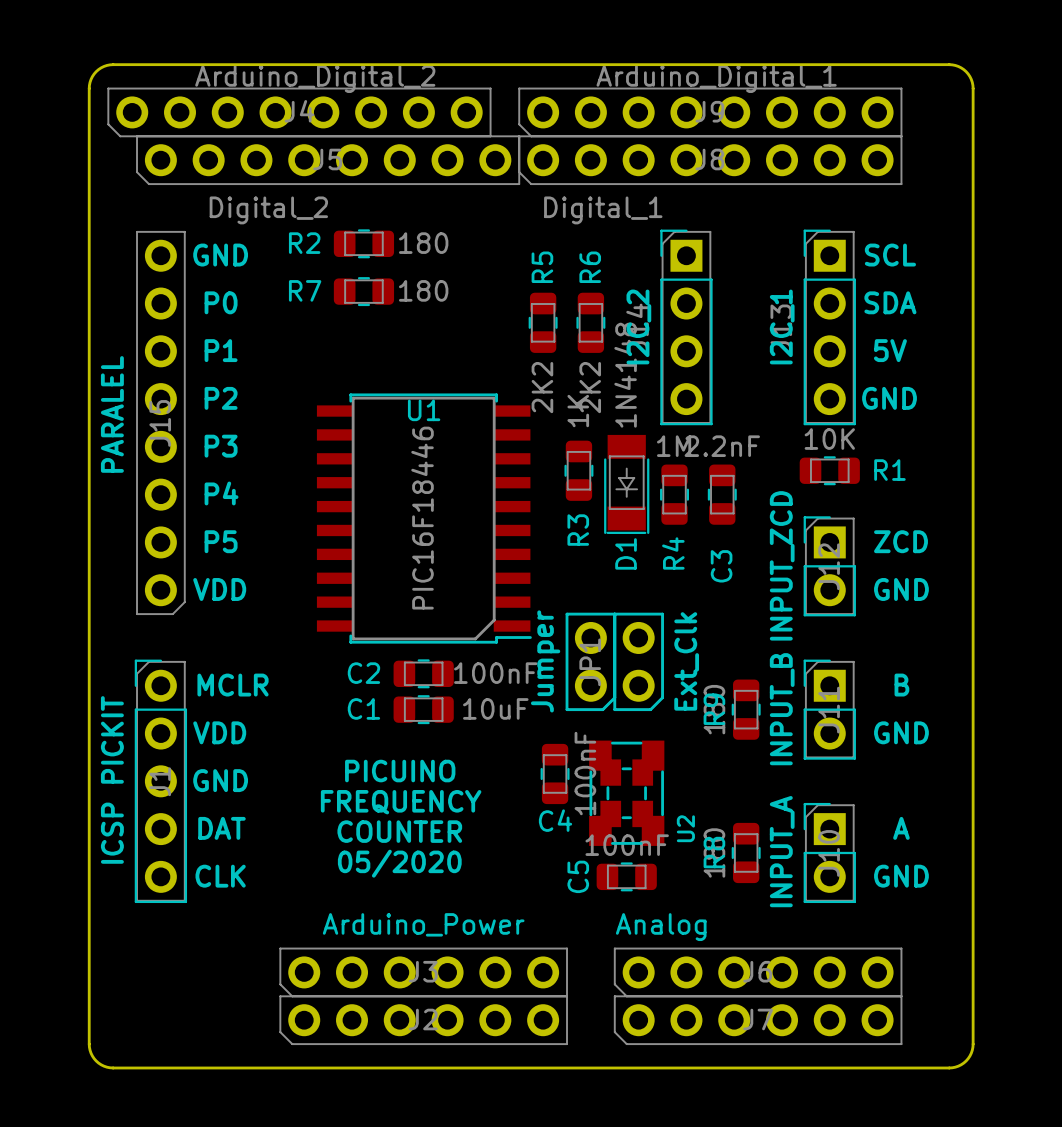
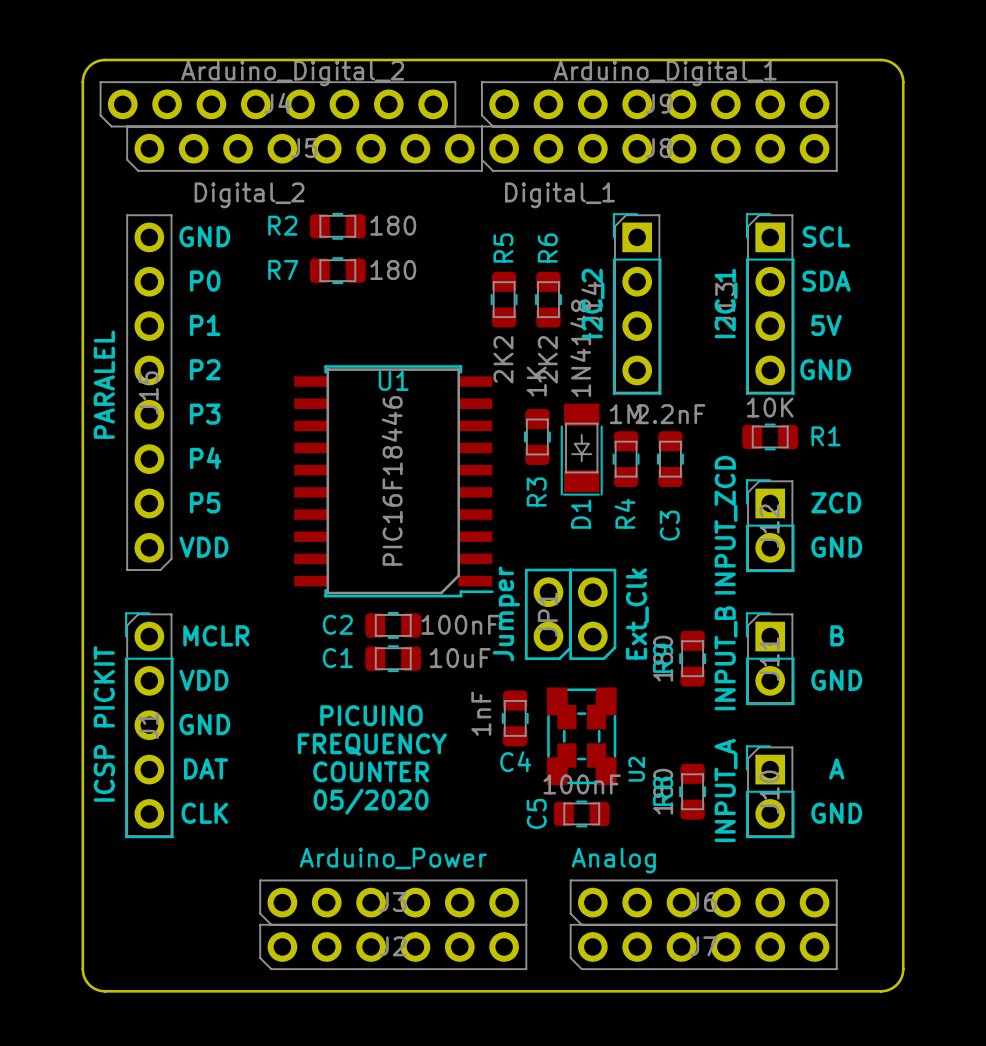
C4 value: 100nF (585, 773) -> 1nF (481, 713)

